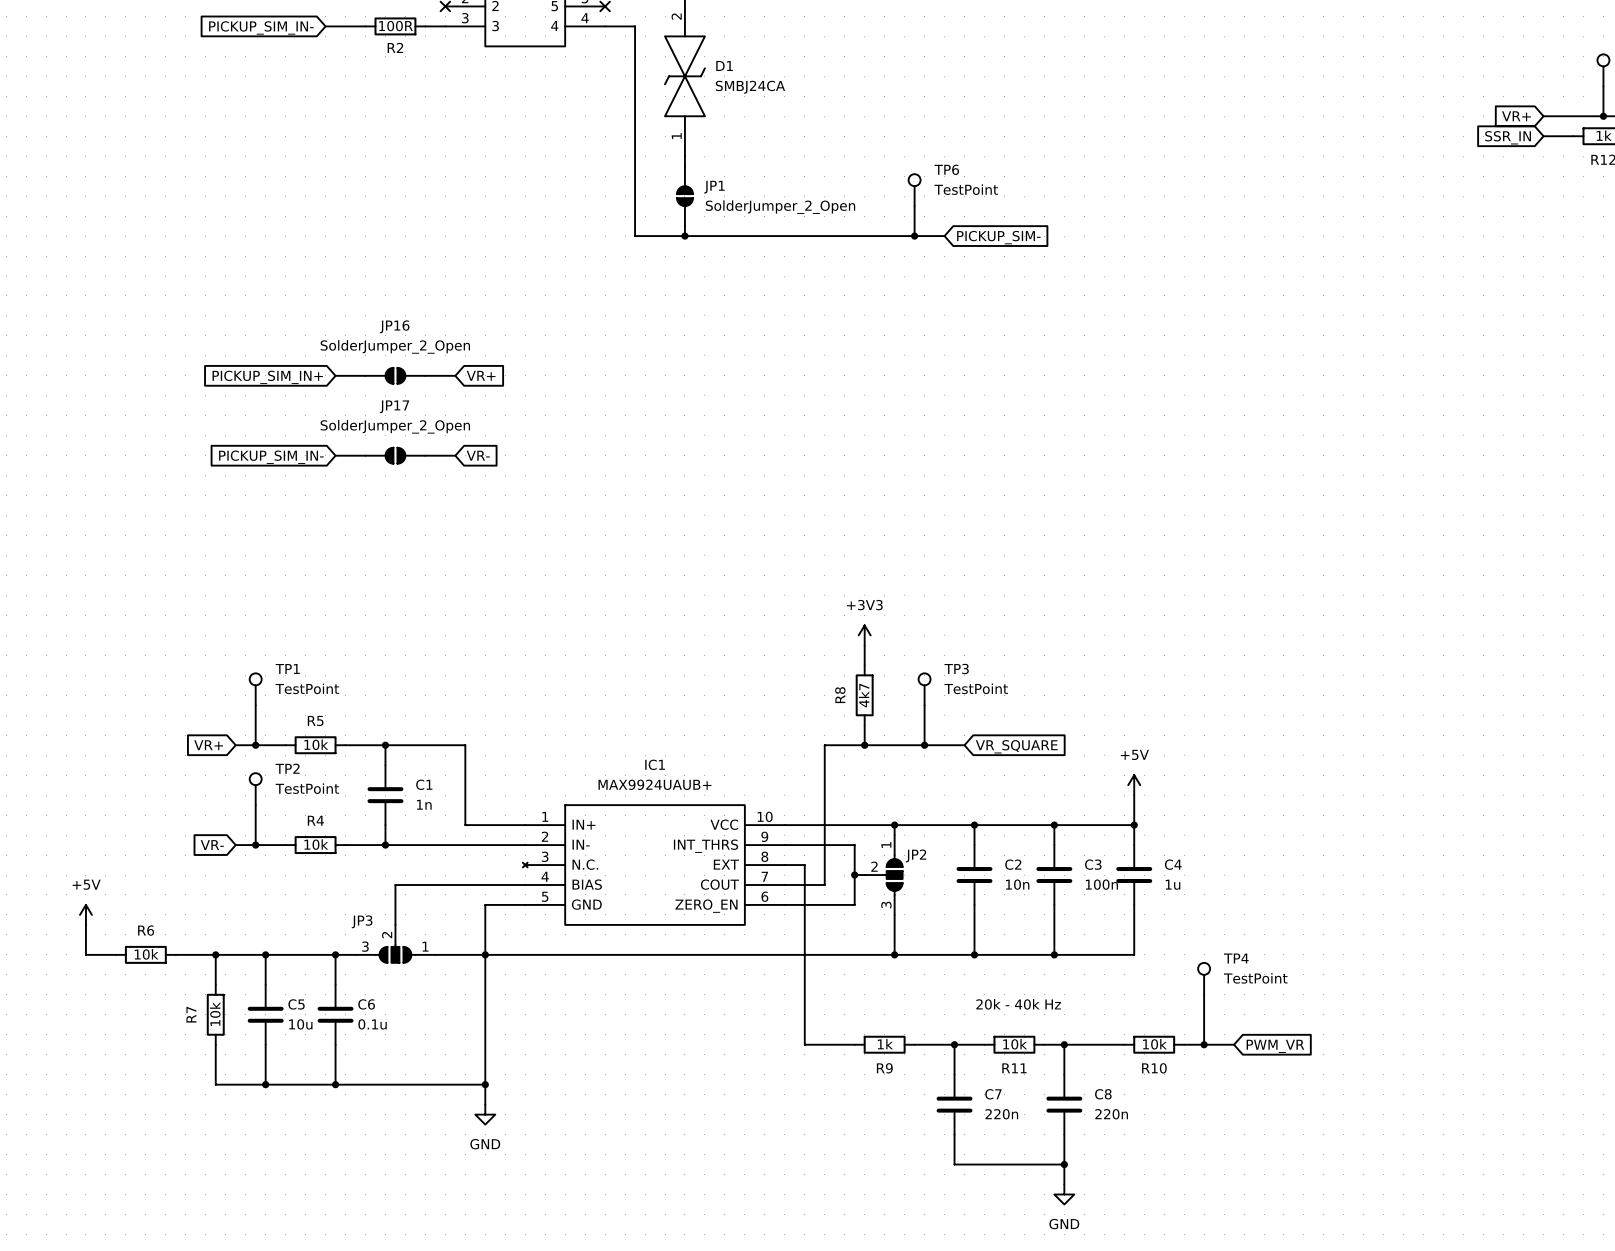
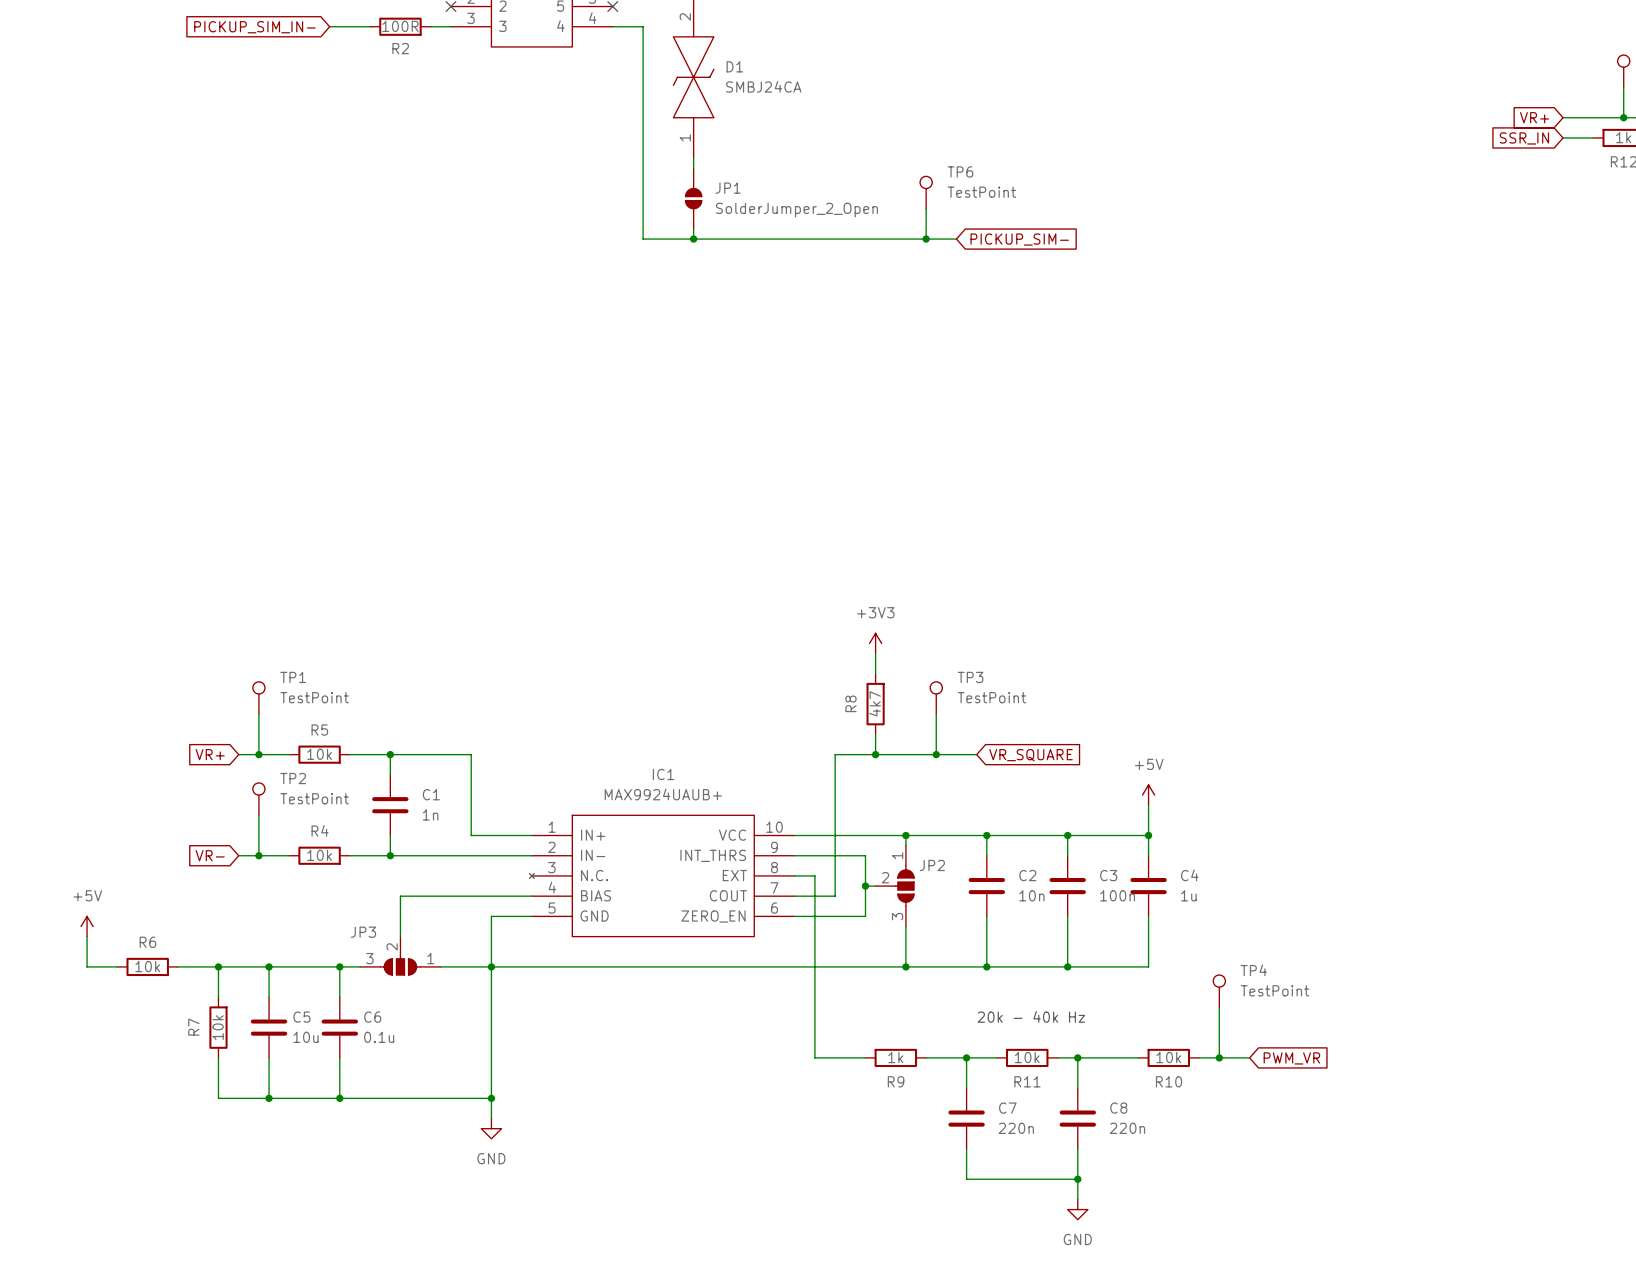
wire: (335, 375) (365, 375) -> none
JP16: SolderJumper_2_Open (395, 375) -> none
wire: (425, 375) (455, 375) -> none
global label: VR+ (481, 375) -> none
global label: PICKUP_SIM_IN+ (267, 377) -> none
wire: (335, 455) (365, 455) -> none
JP17: SolderJumper_2_Open (395, 455) -> none
wire: (425, 455) (455, 455) -> none
global label: VR- (478, 455) -> none
global label: PICKUP_SIM_IN- (271, 457) -> none

